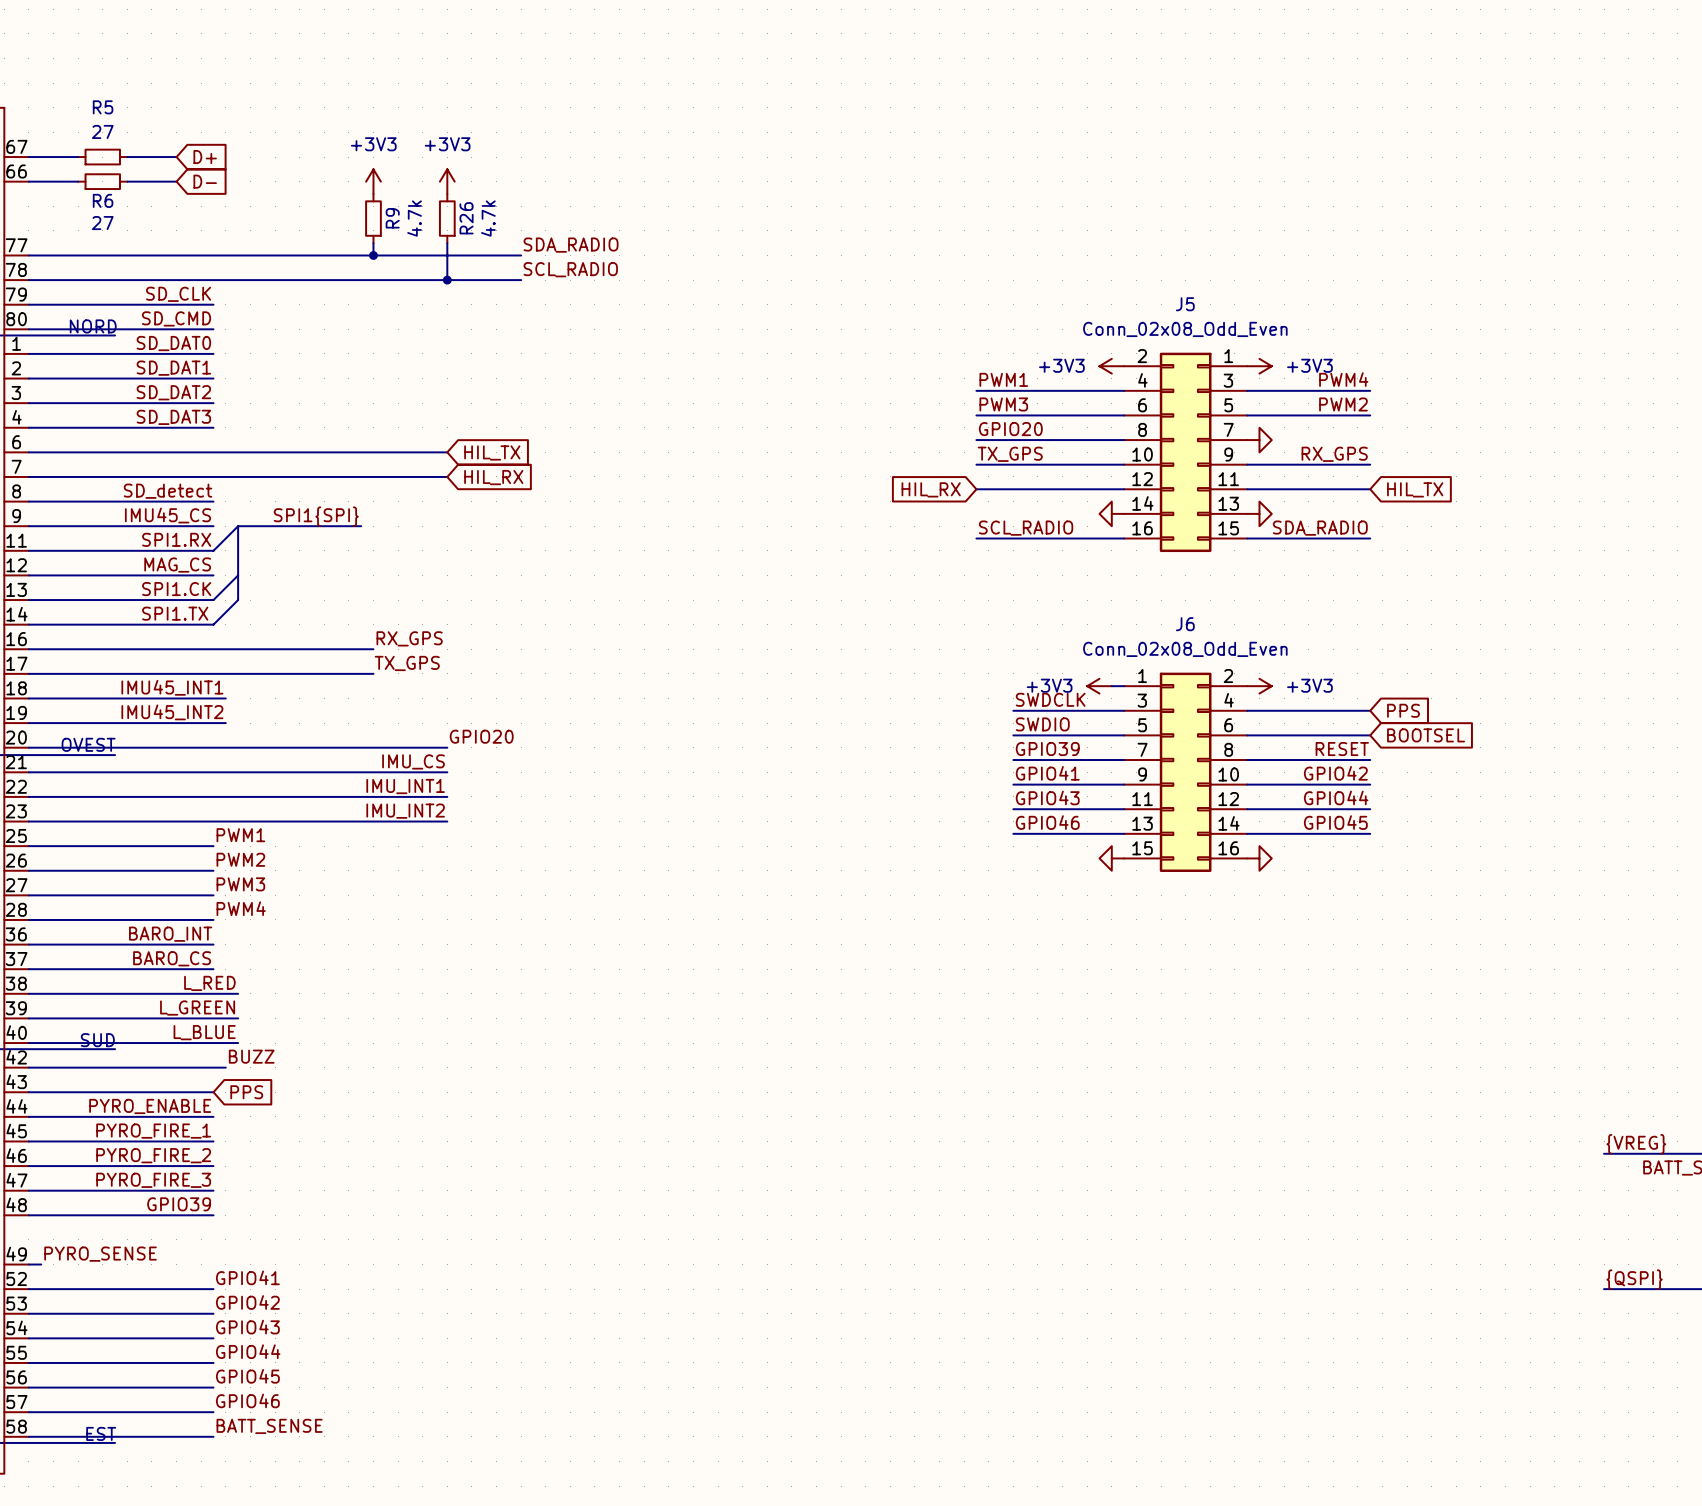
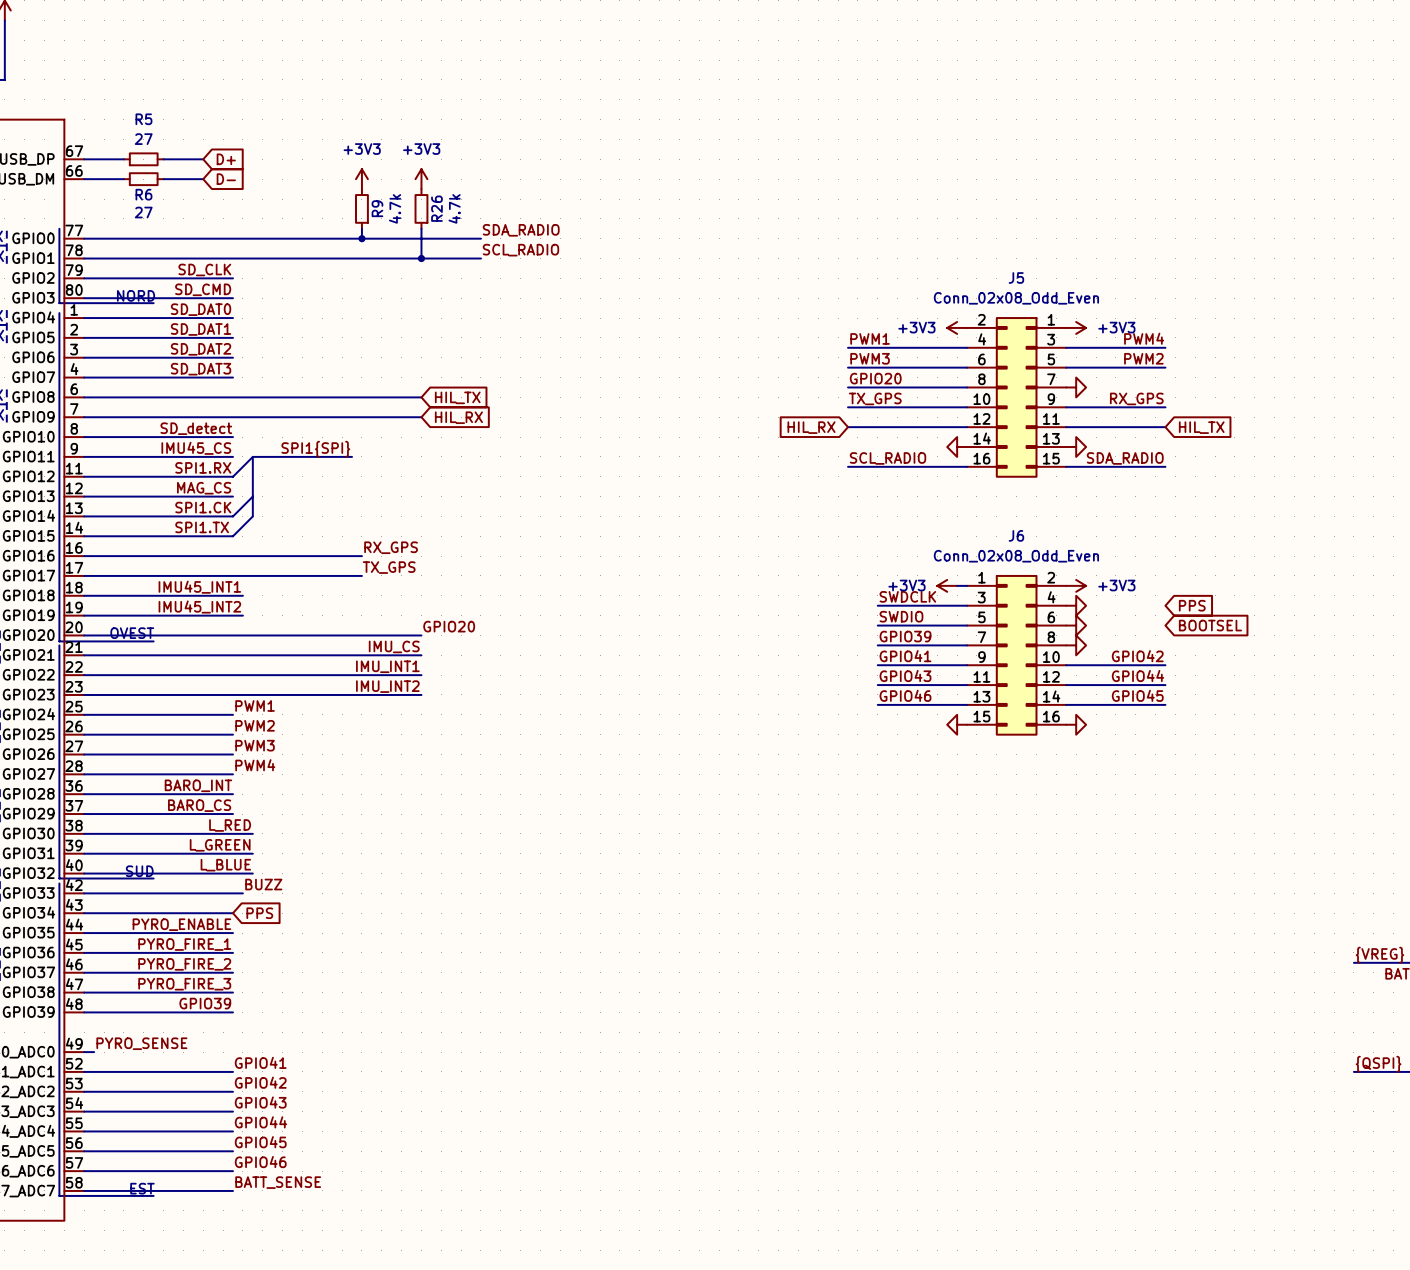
wire: (1247, 710) (1370, 710) -> none
power symbol: none -> (1076, 605)
wire: (1247, 735) (1370, 735) -> none
power symbol: none -> (1076, 625)
label: RESET (1342, 749) -> none
wire: (1247, 760) (1370, 760) -> none
power symbol: none -> (1076, 645)

